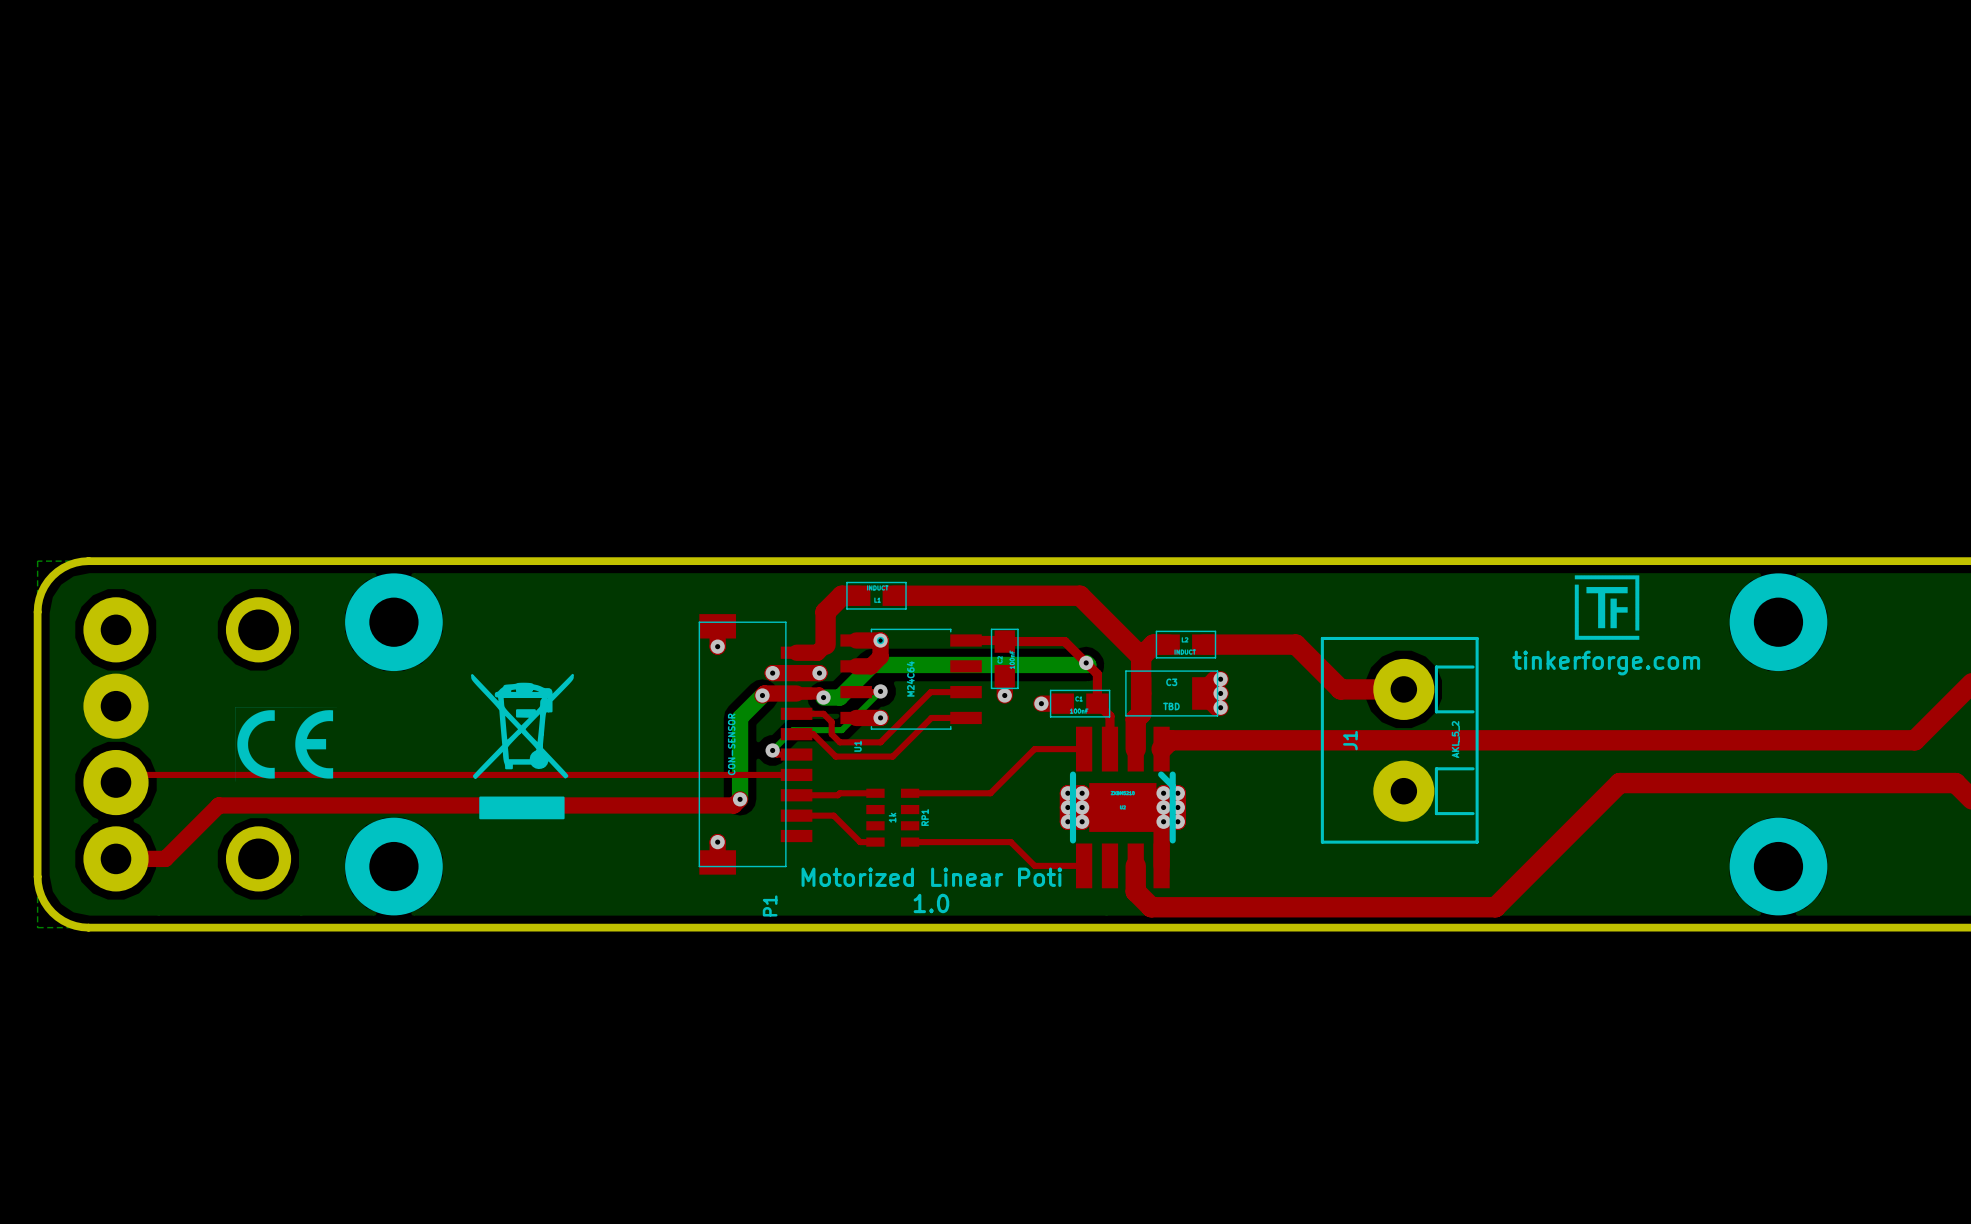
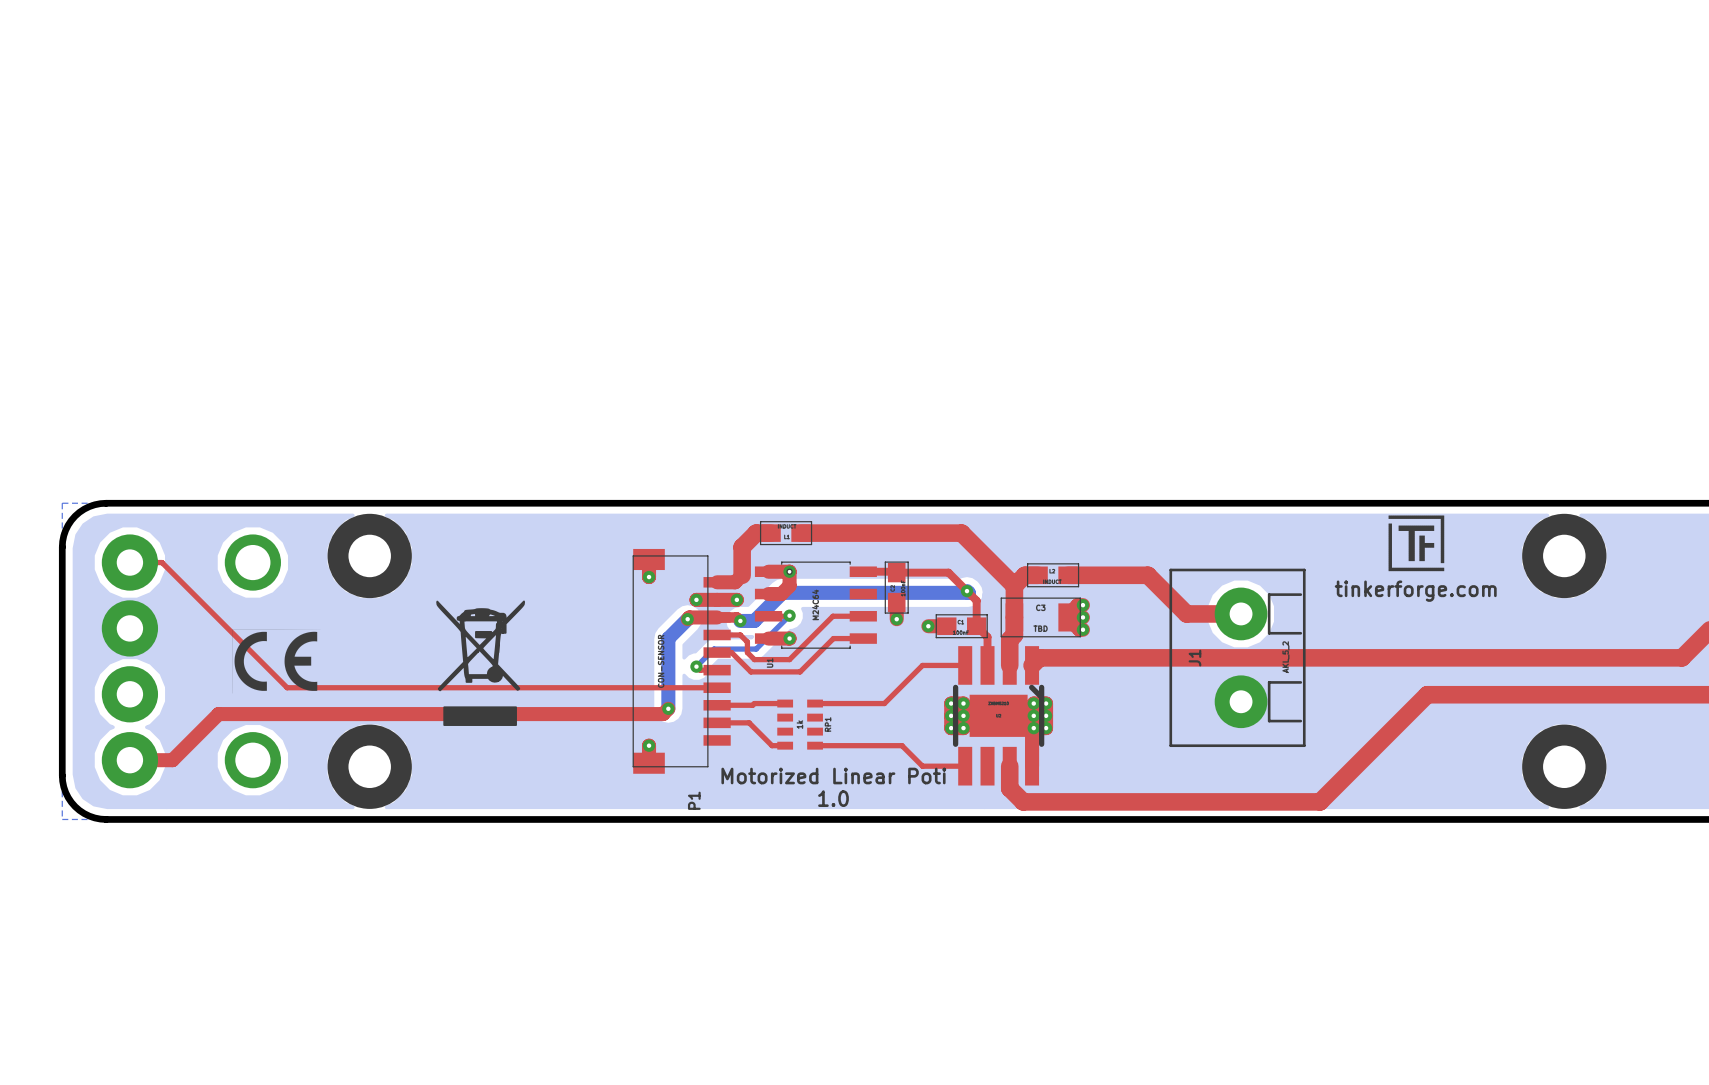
top track: (123, 774) (298, 774) -> (129, 562) (161, 562) (287, 687)

